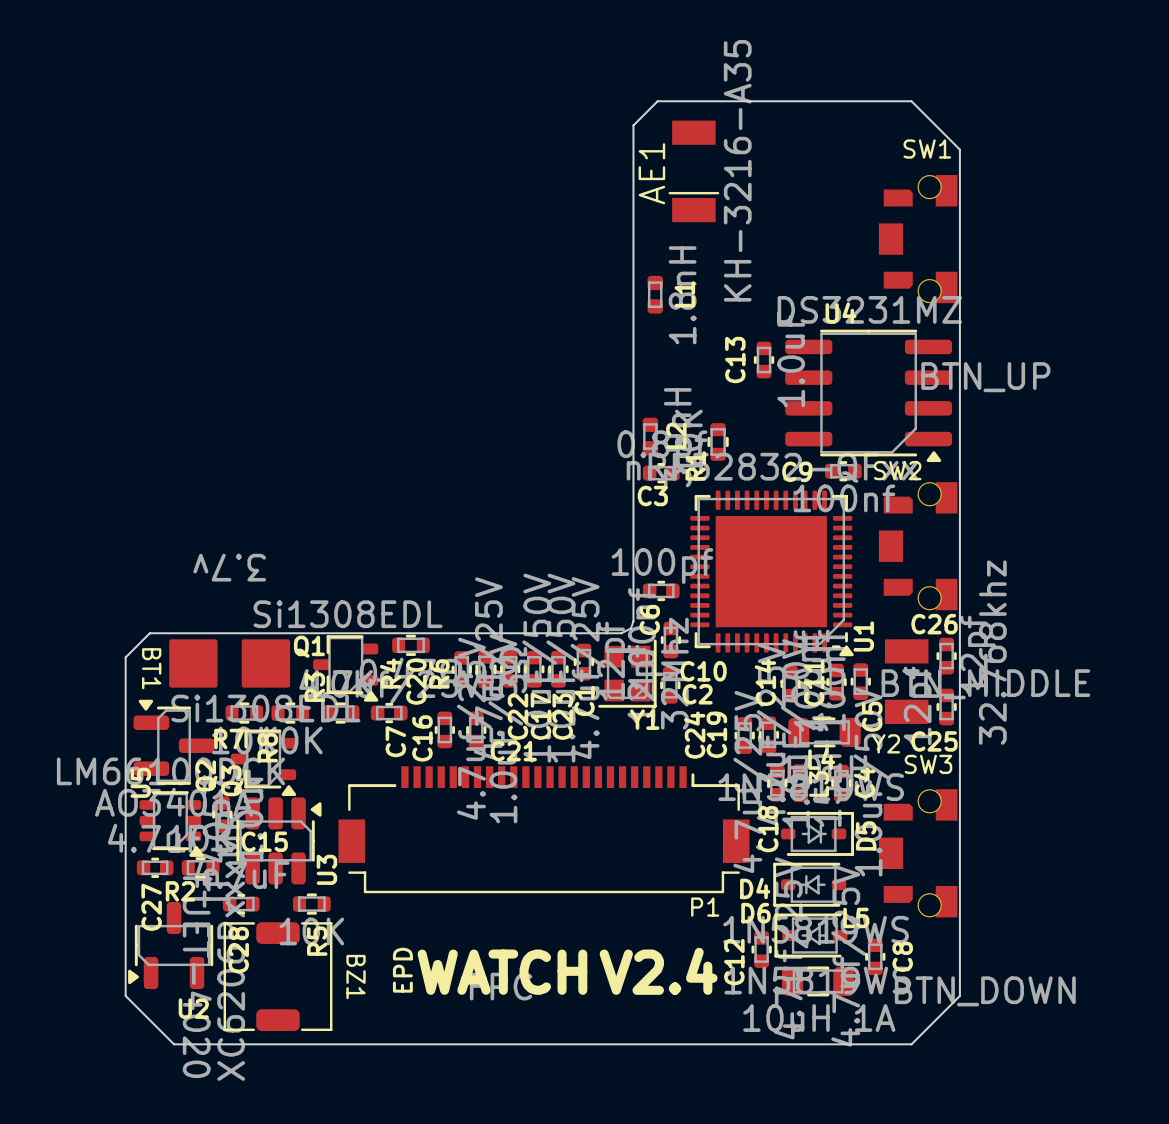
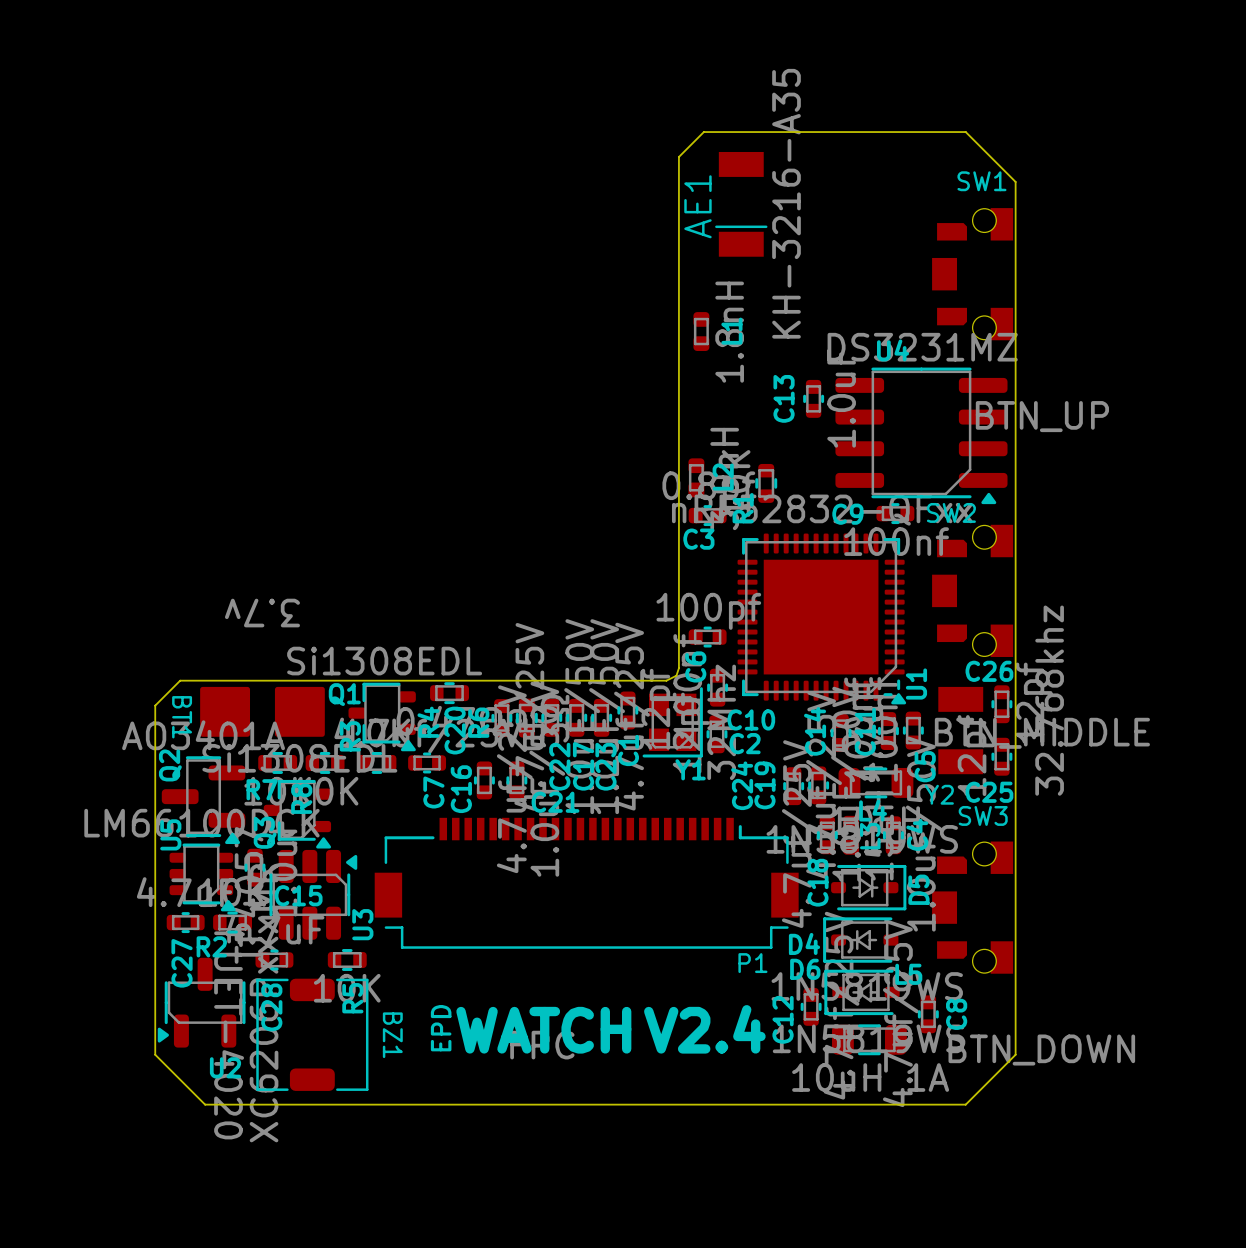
Q2 rotation: 0° (174, 742) -> 180° (203, 800)

